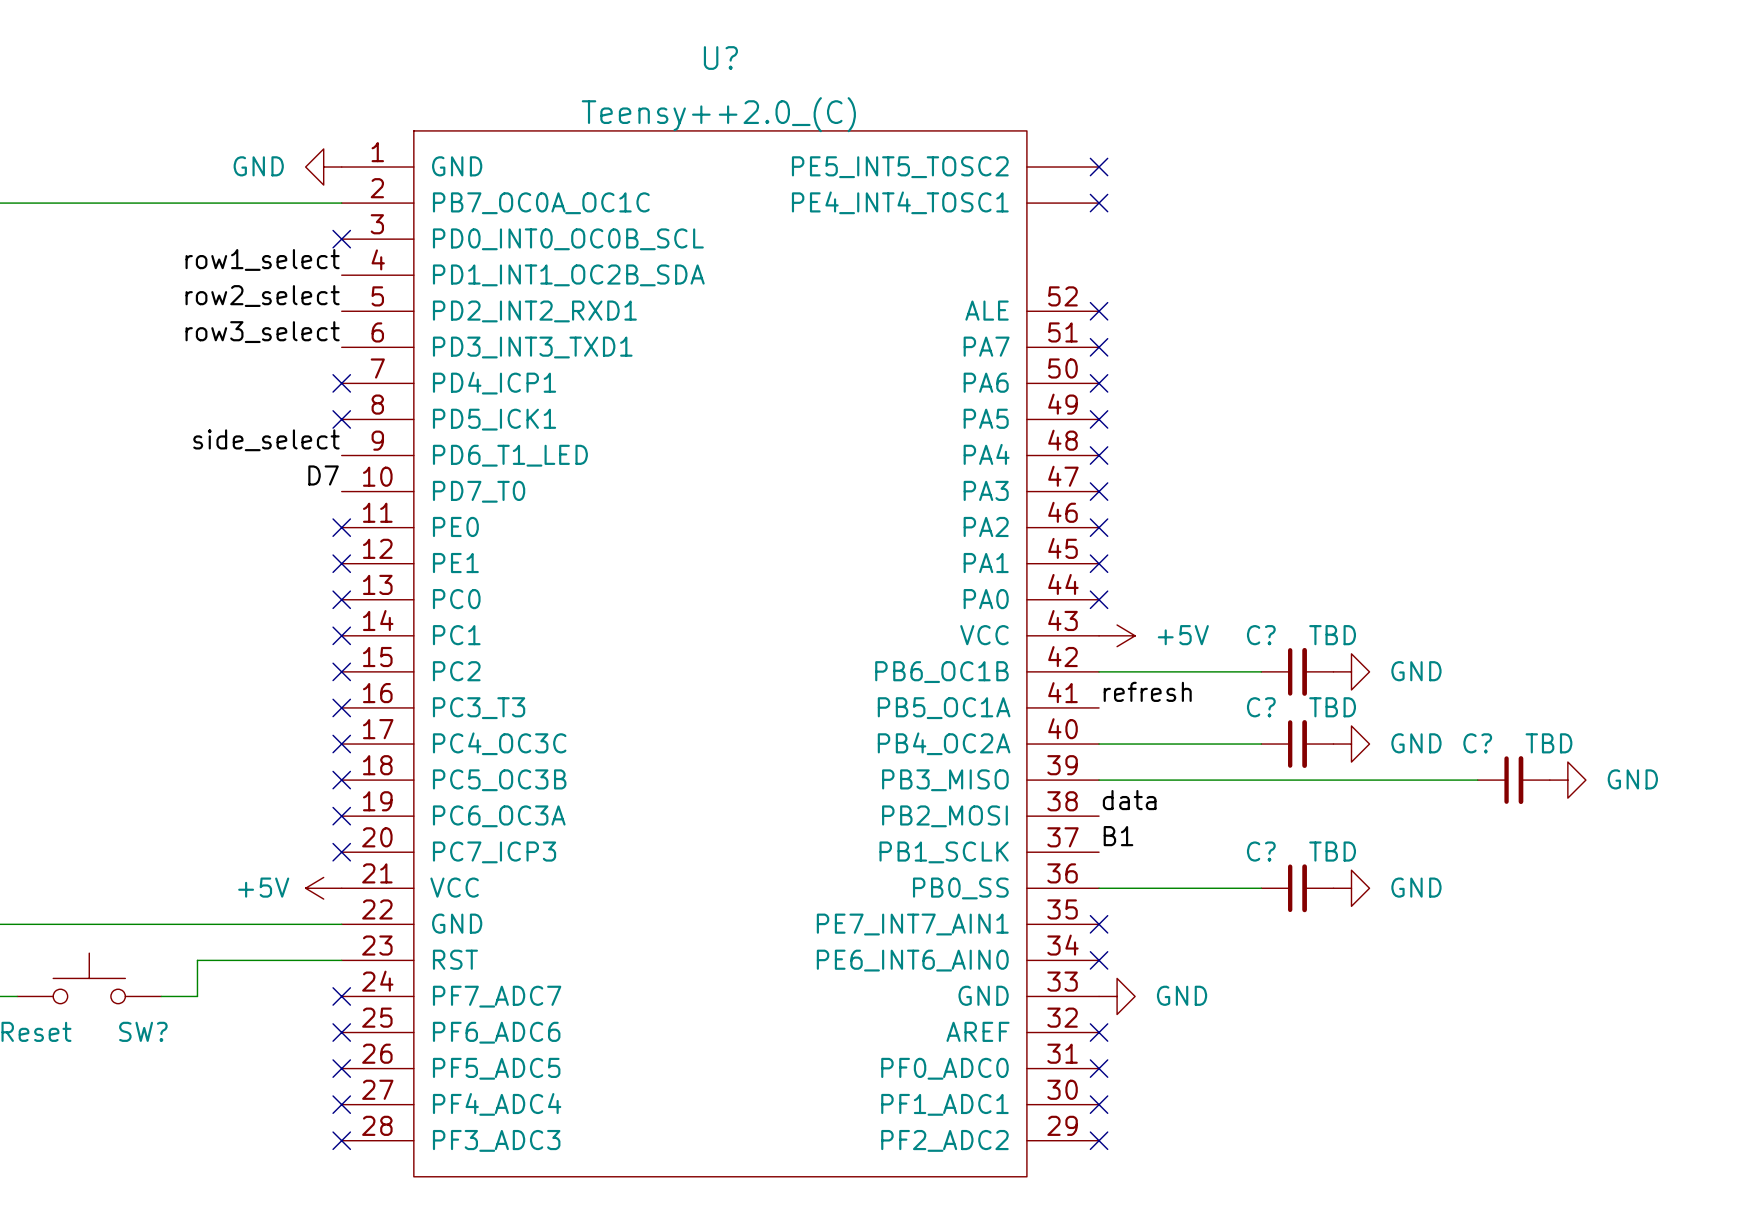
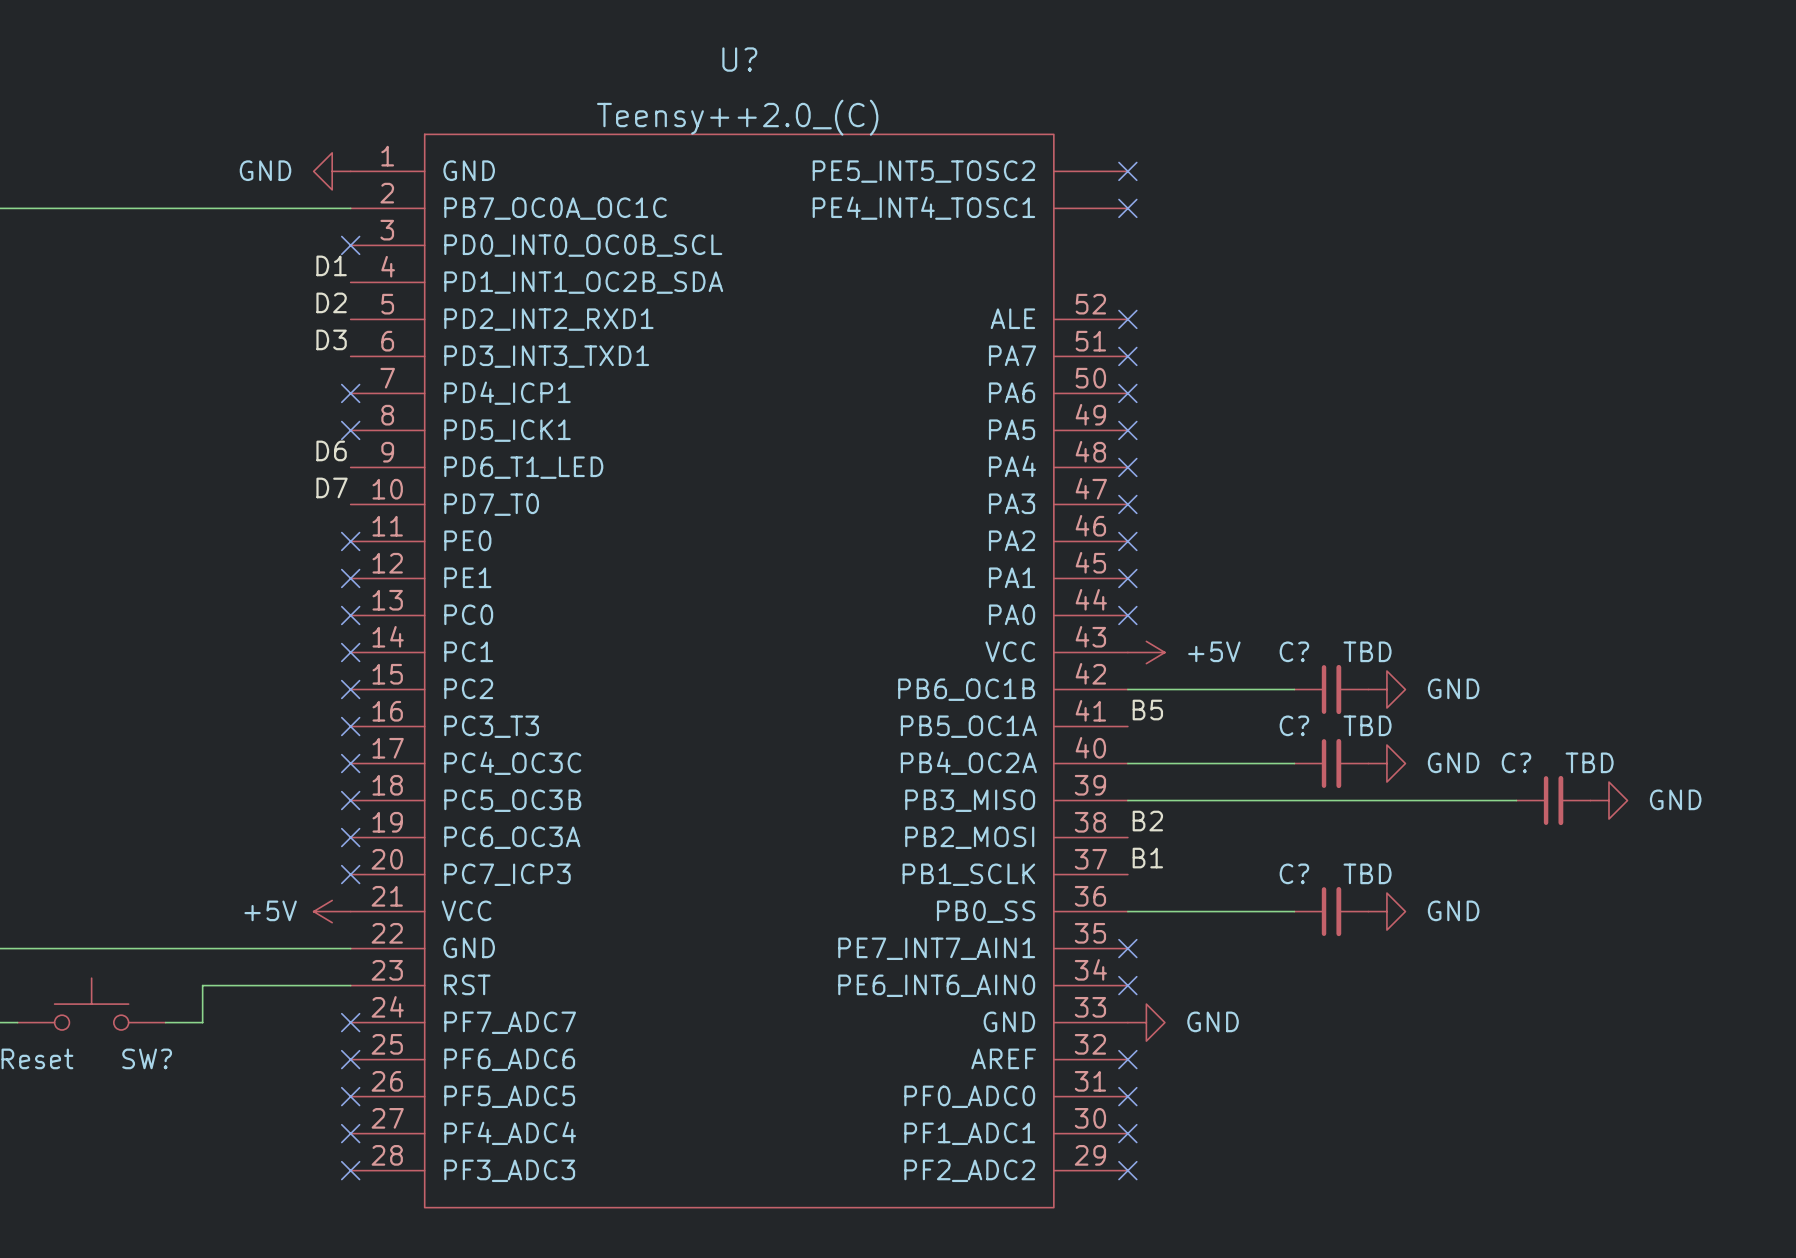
label: row1_select (262, 259) -> D1 (331, 265)
label: row2_select (262, 296) -> D2 (331, 302)
label: row3_select (262, 332) -> D3 (331, 339)
label: side_select (266, 440) -> D6 (331, 450)
label: refresh (1147, 691) -> B5 (1147, 710)
label: data (1129, 800) -> B2 (1147, 821)

